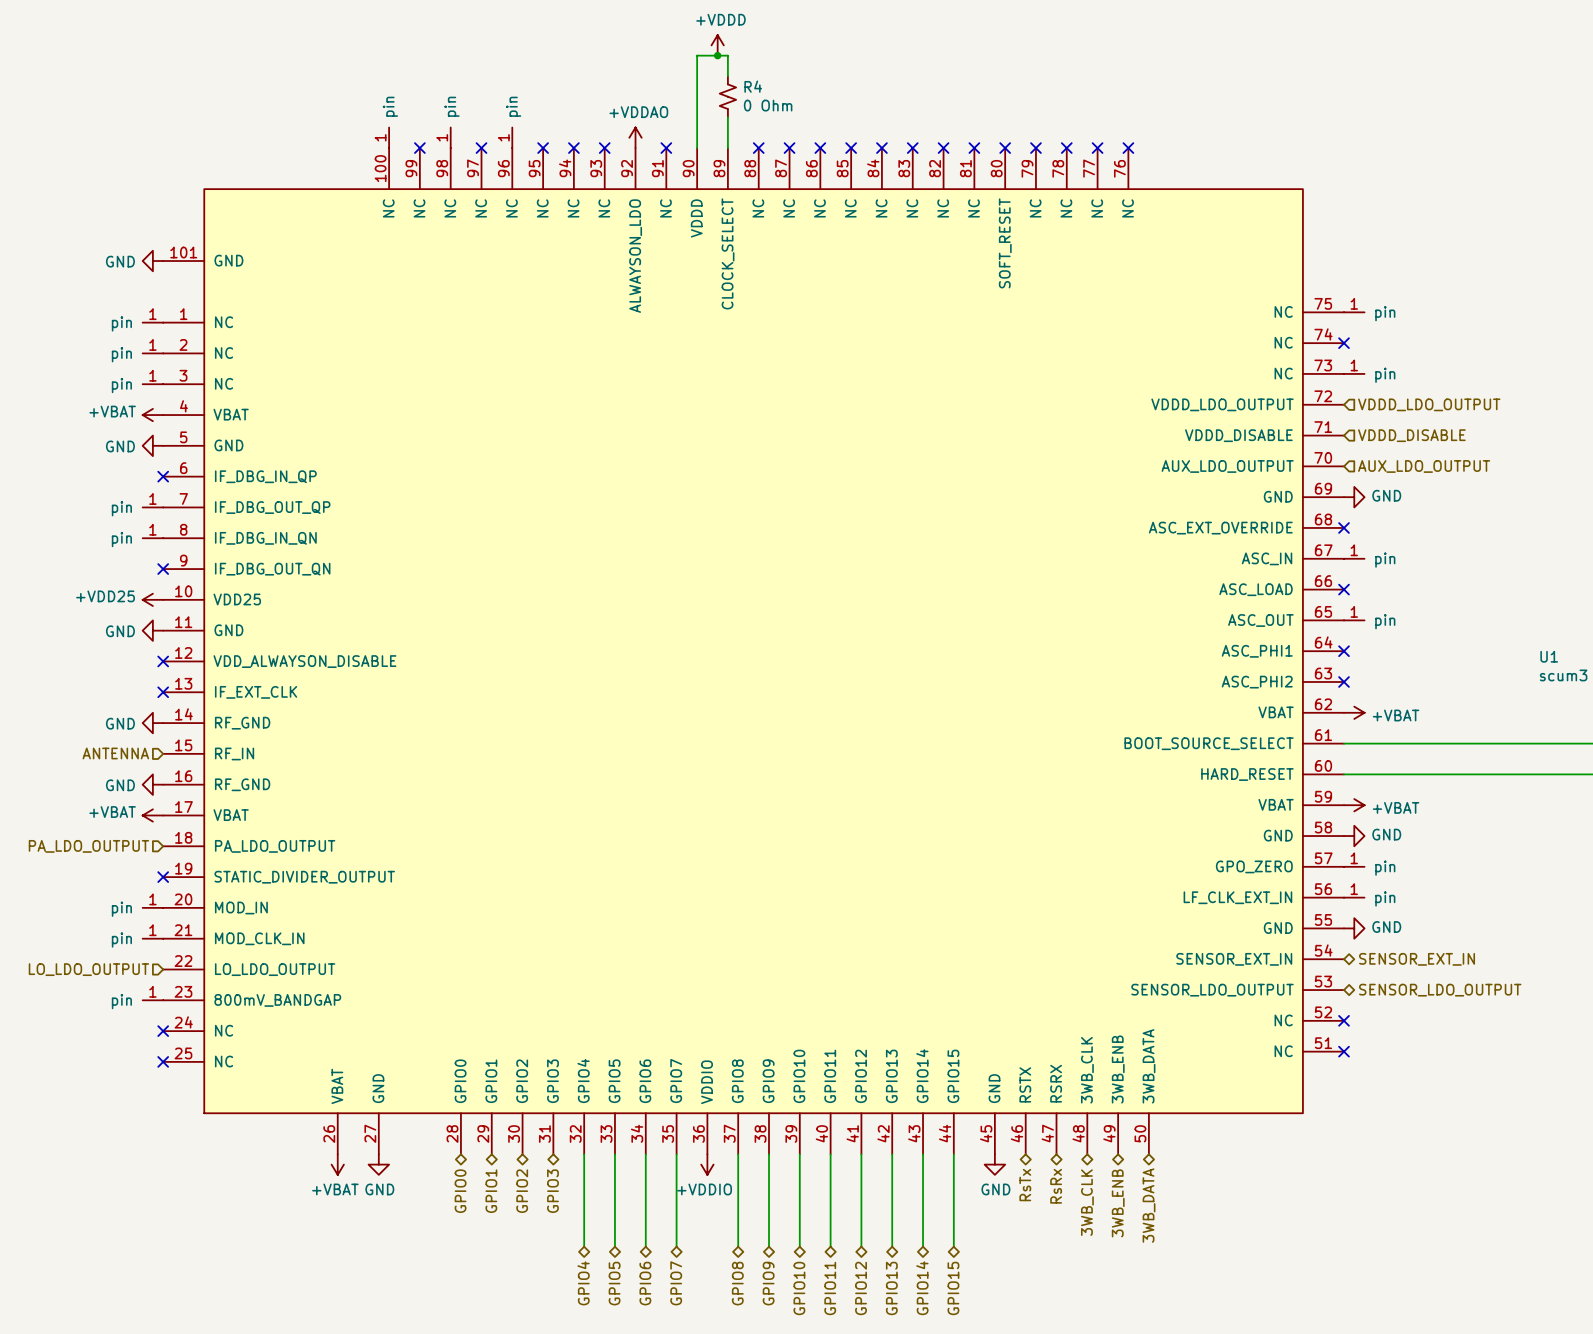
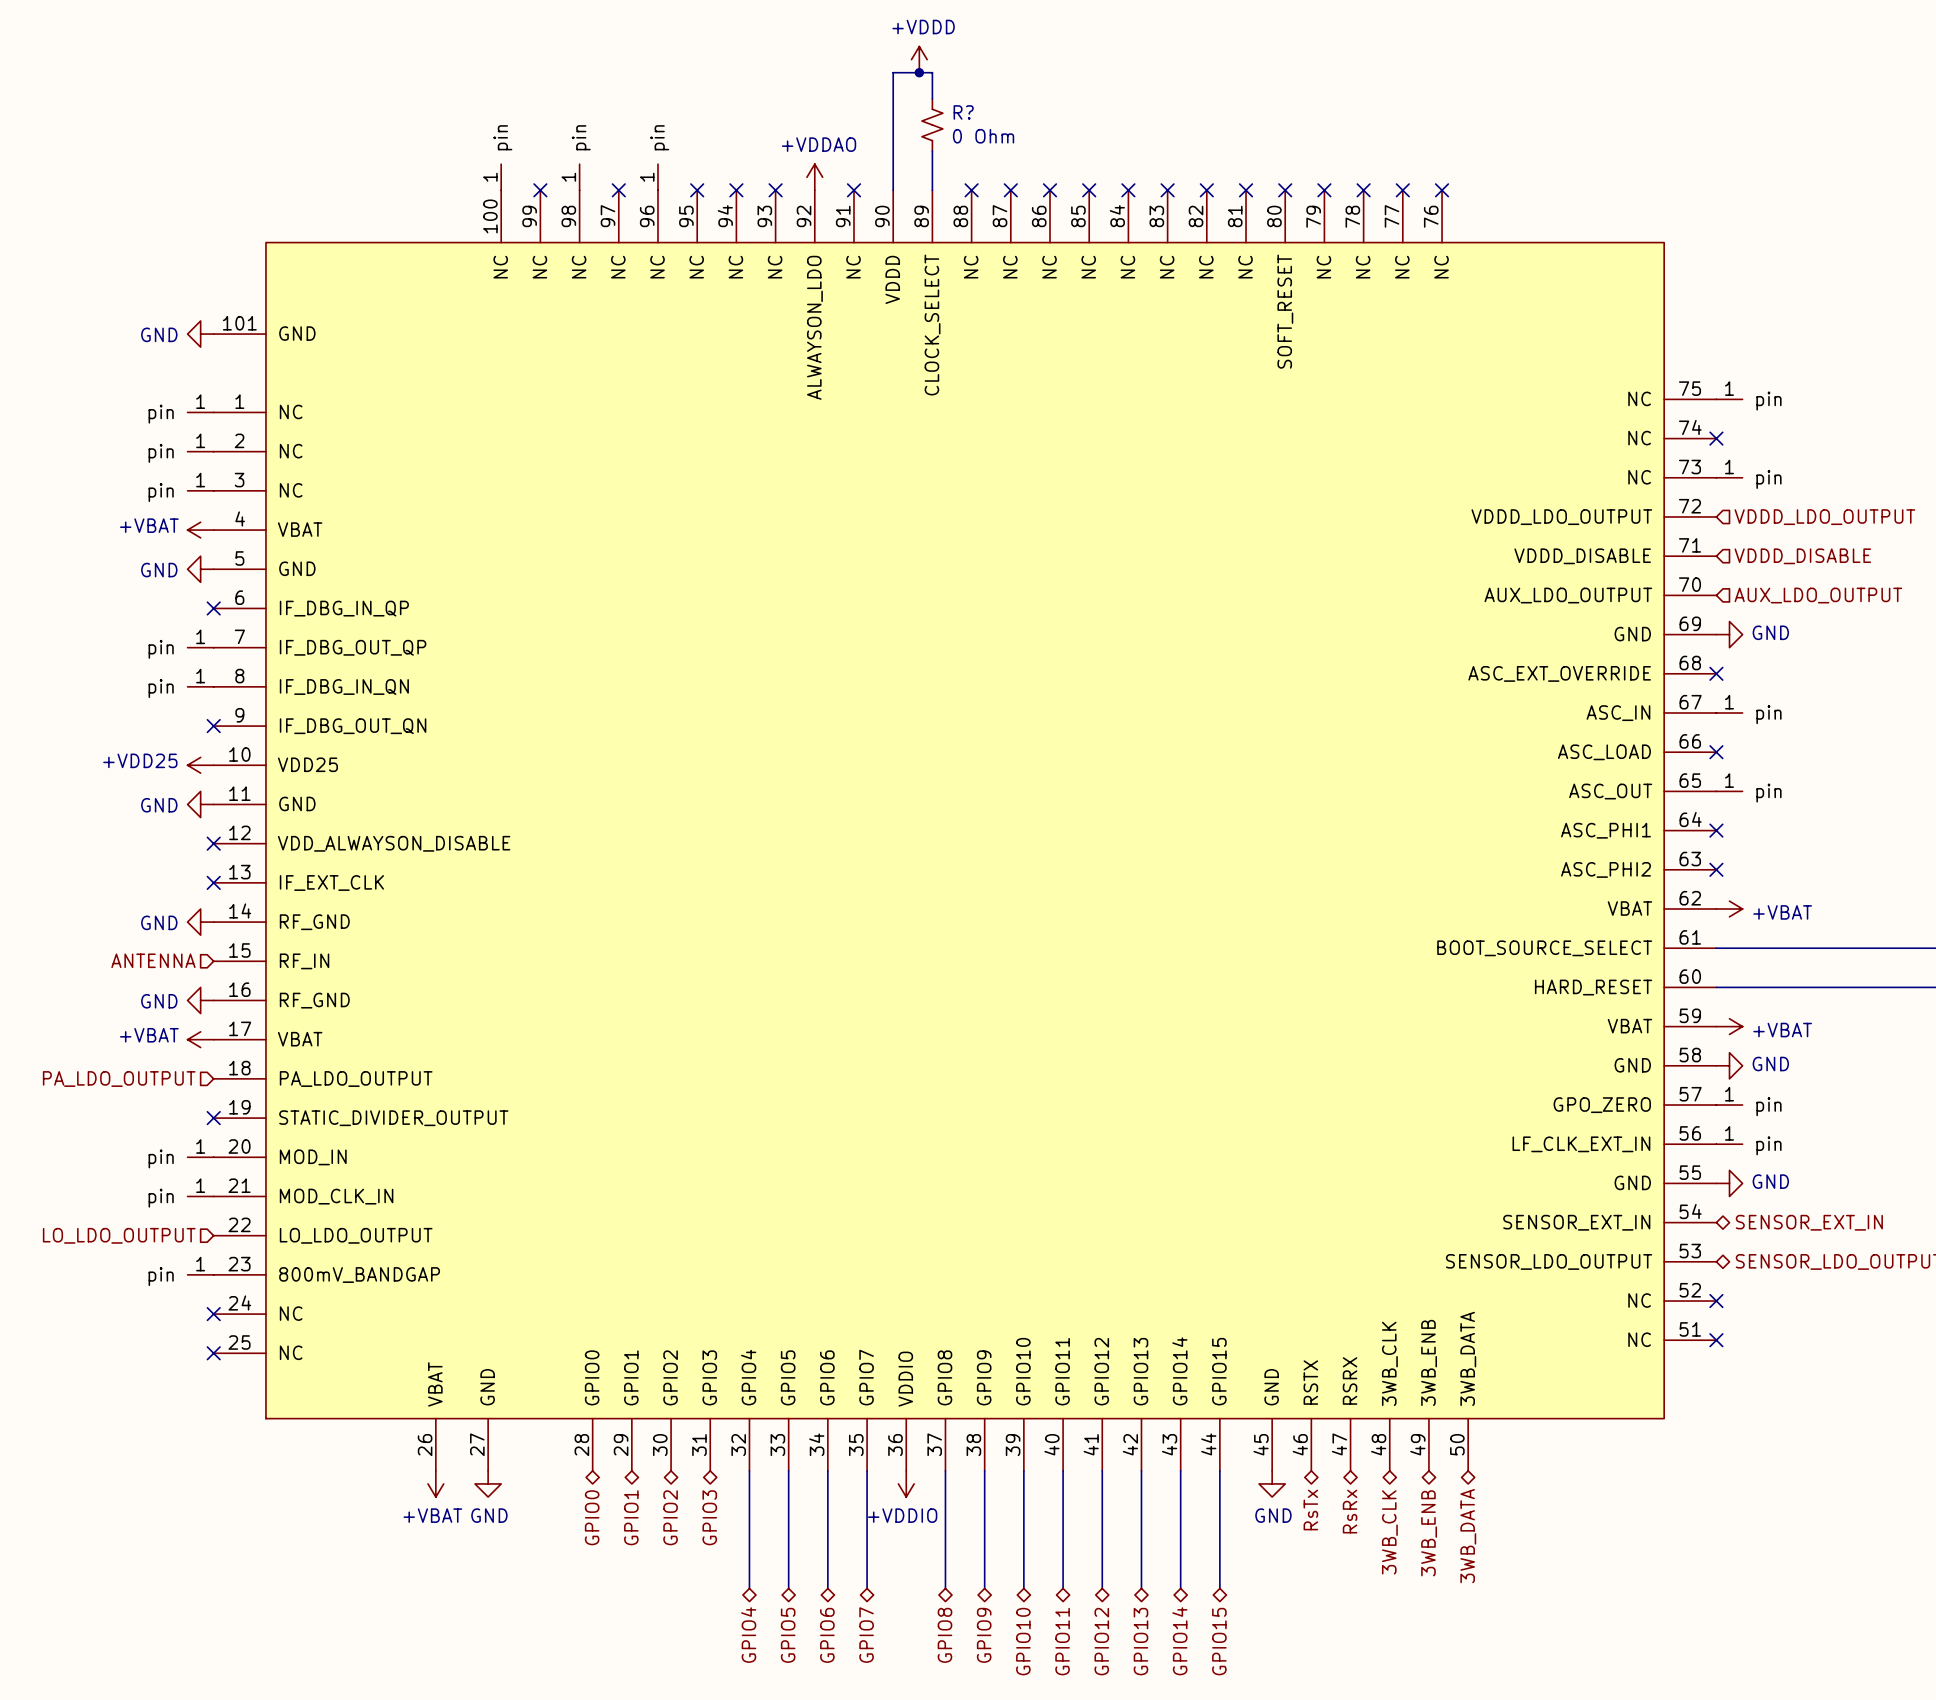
R4 name: R4 (753, 86) -> R? (963, 112)

